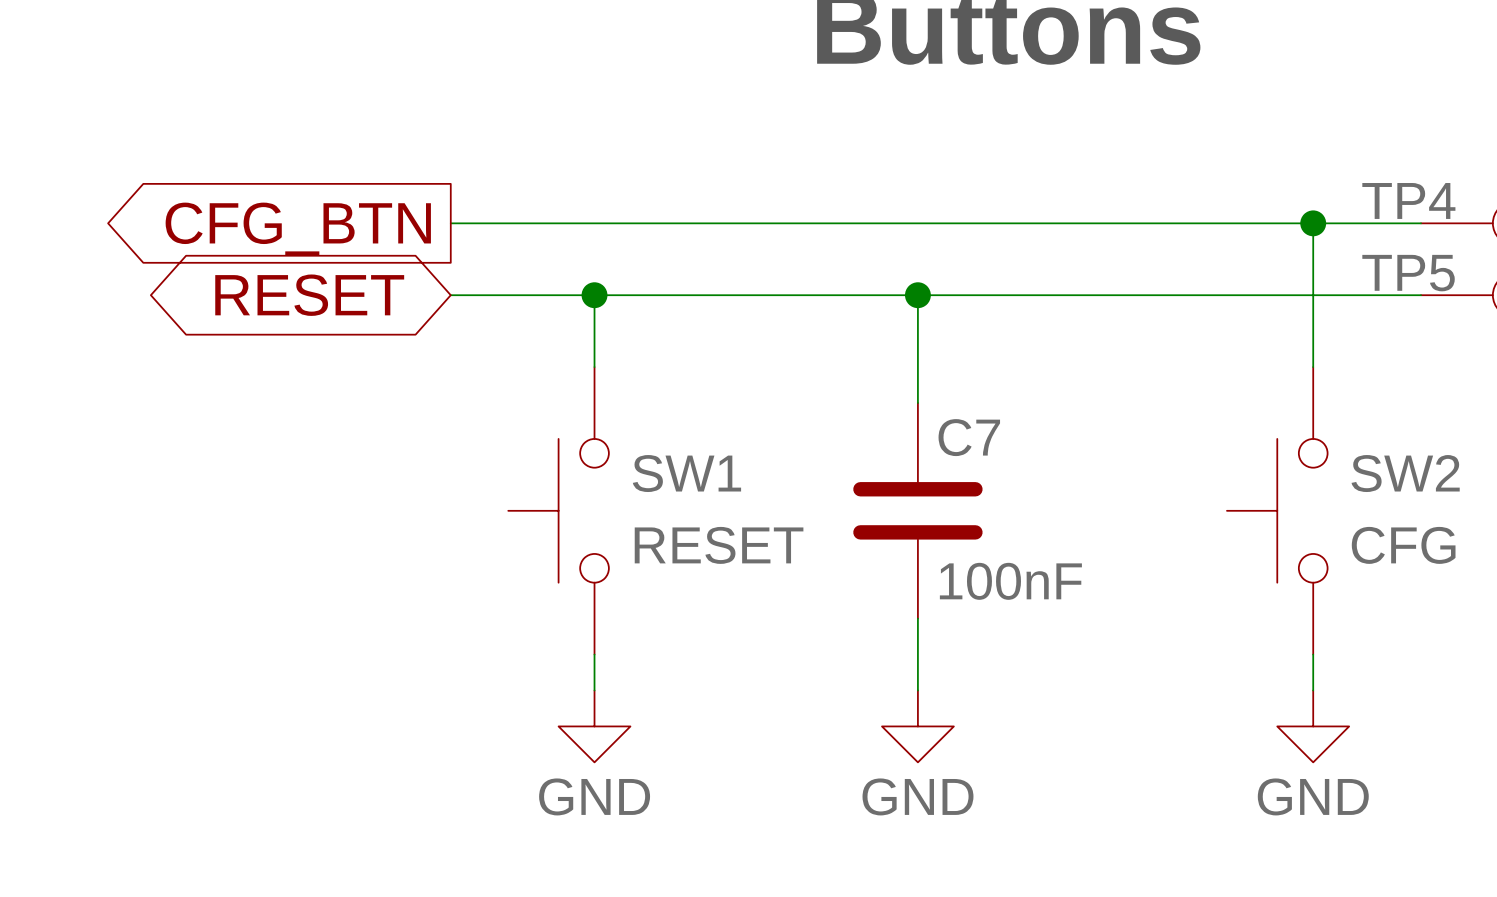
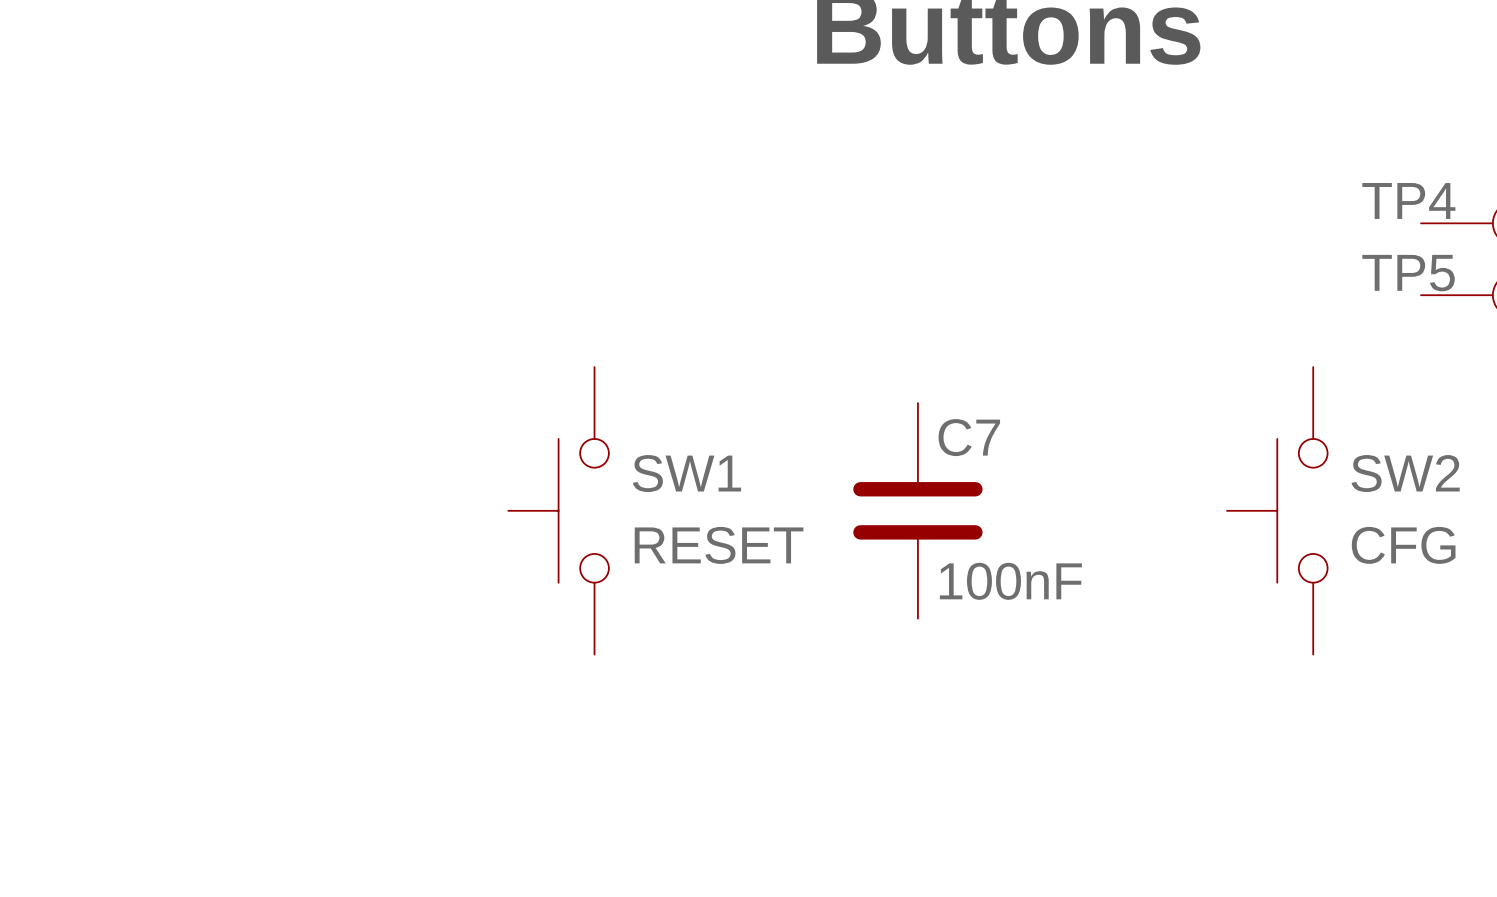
wire: (450, 223) (1421, 223) -> none
wire: (1313, 223) (1313, 367) -> none
junction: (1313, 223) -> none
global label: CFG_BTN (298, 228) -> none
global label: RESET (309, 295) -> none
wire: (450, 295) (1421, 295) -> none
wire: (594, 295) (594, 367) -> none
junction: (594, 295) -> none
wire: (917, 295) (917, 403) -> none
junction: (917, 295) -> none
wire: (917, 618) (917, 690) -> none
wire: (594, 654) (594, 690) -> none
wire: (1313, 654) (1313, 690) -> none
power symbol: GND (594, 726) -> none
power symbol: GND (917, 726) -> none
power symbol: GND (1313, 726) -> none

